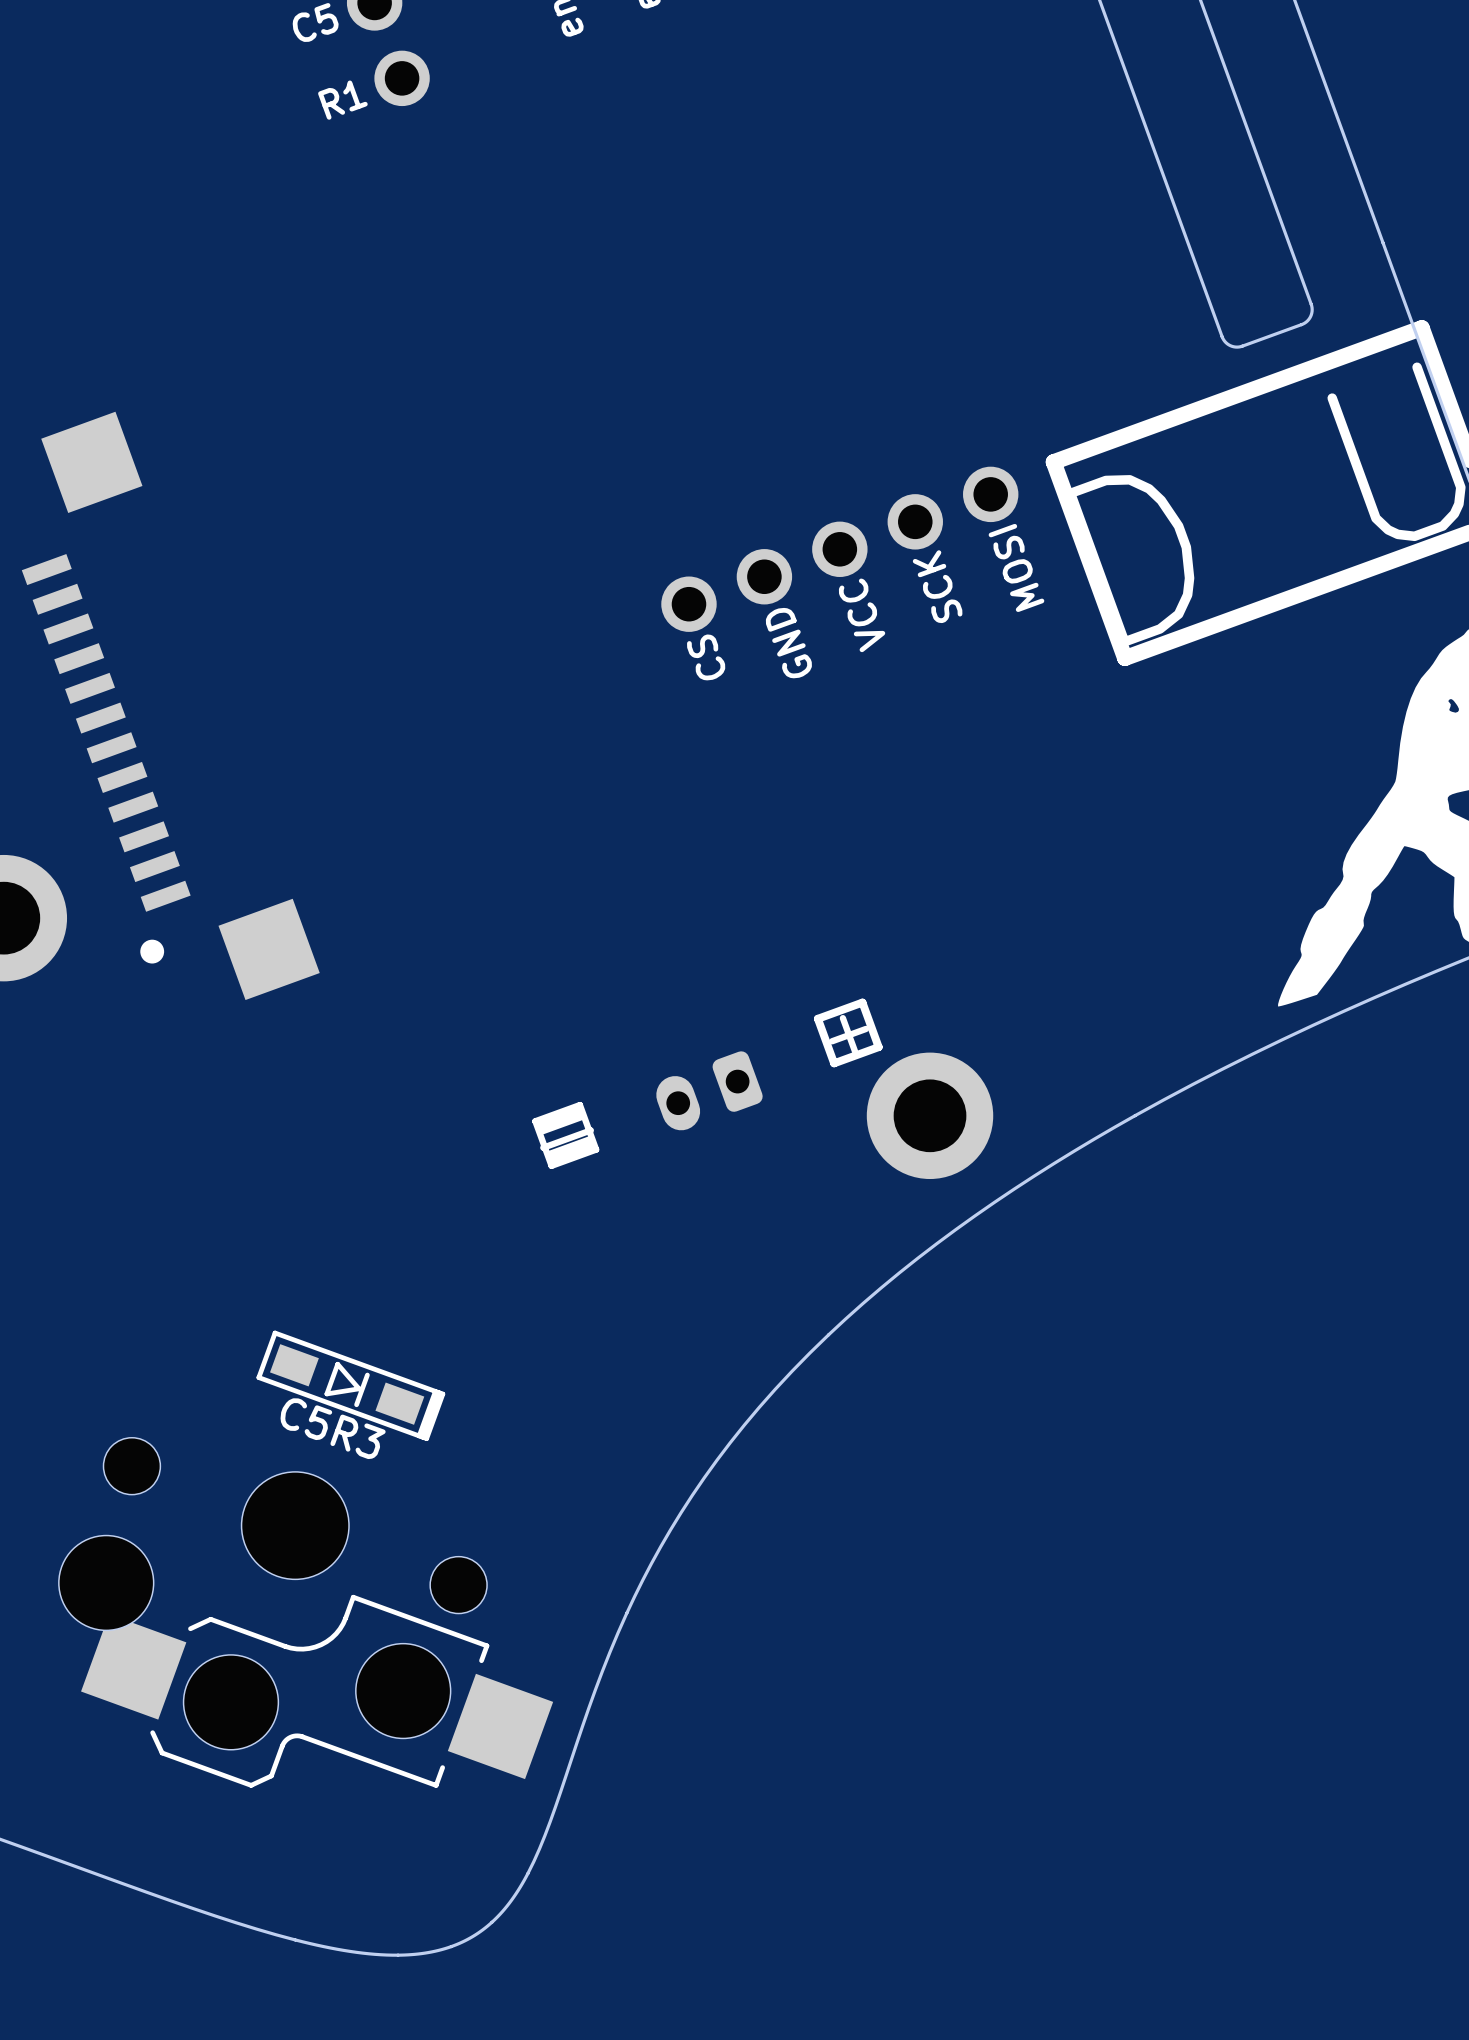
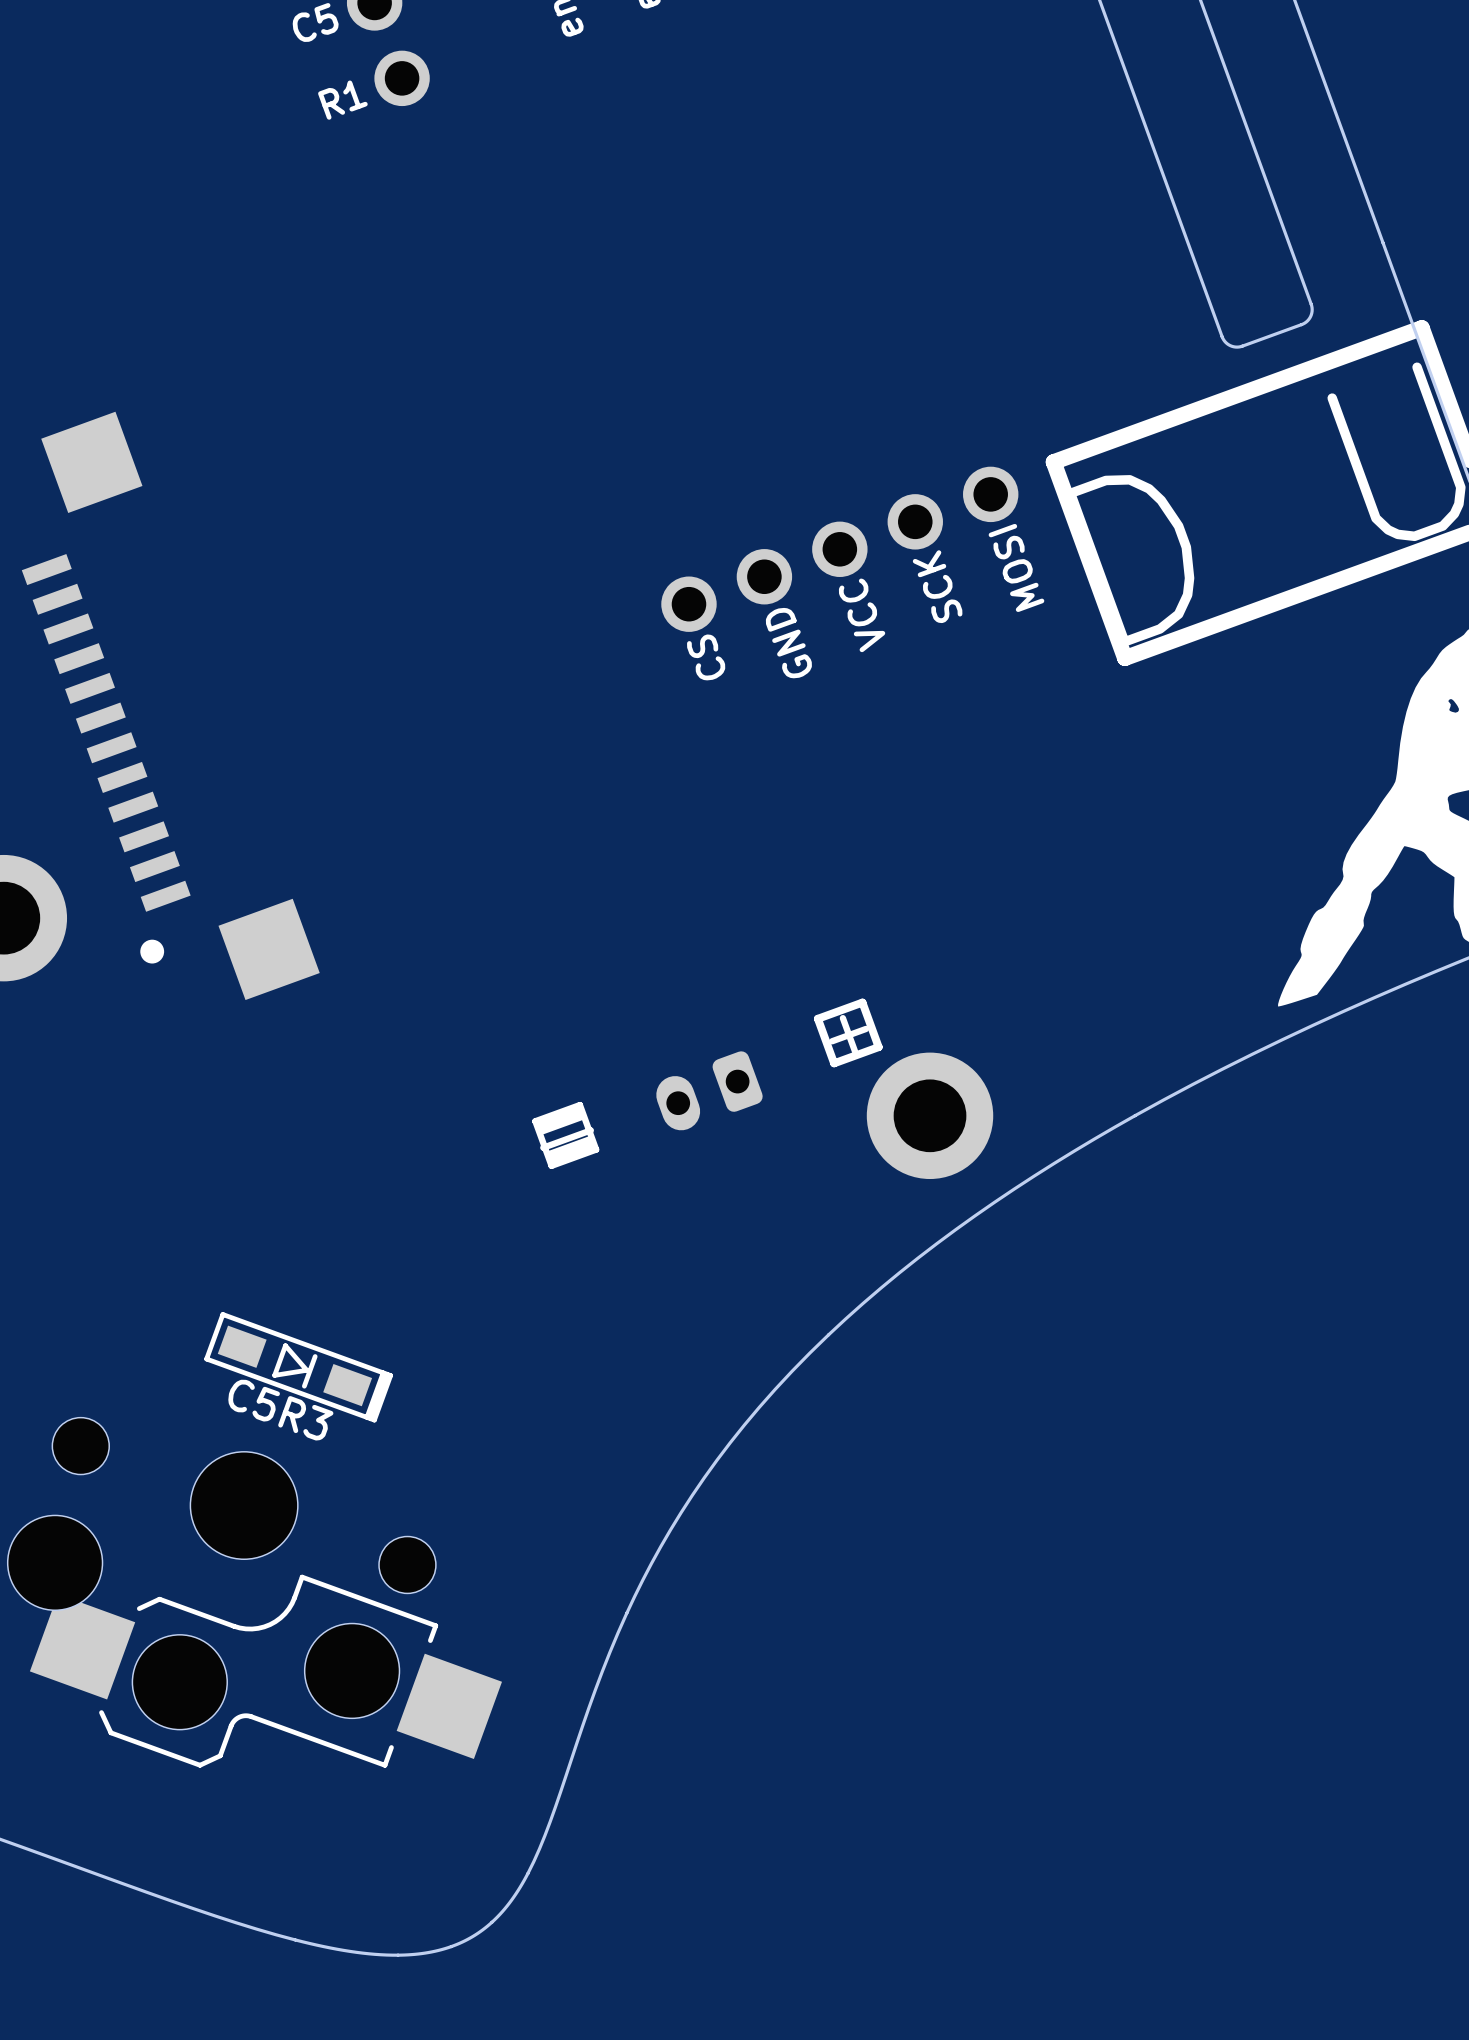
part position: (350, 1385) -> (298, 1367)
part position: (306, 1612) -> (254, 1592)

